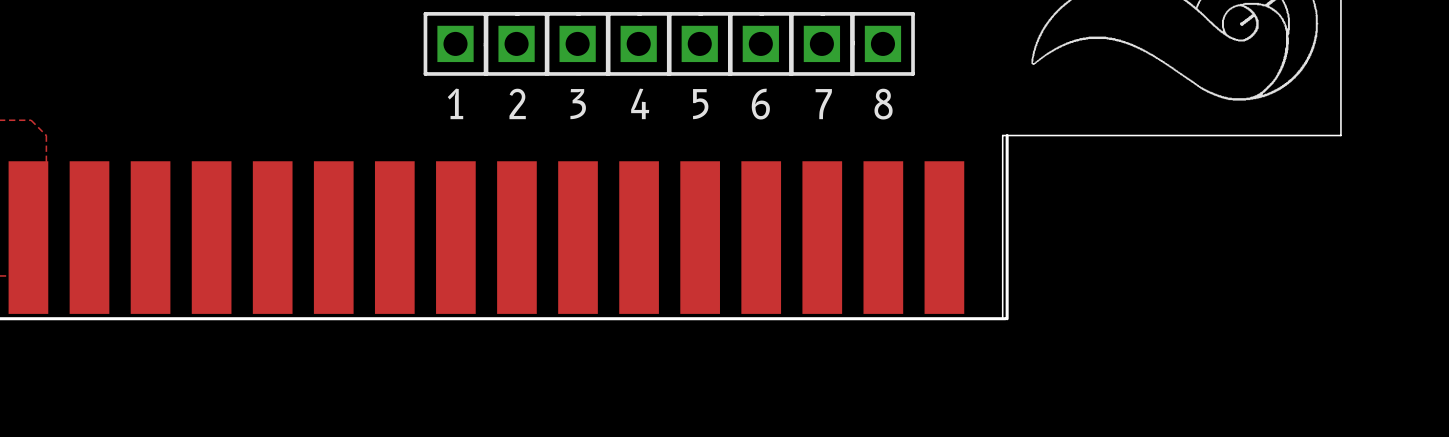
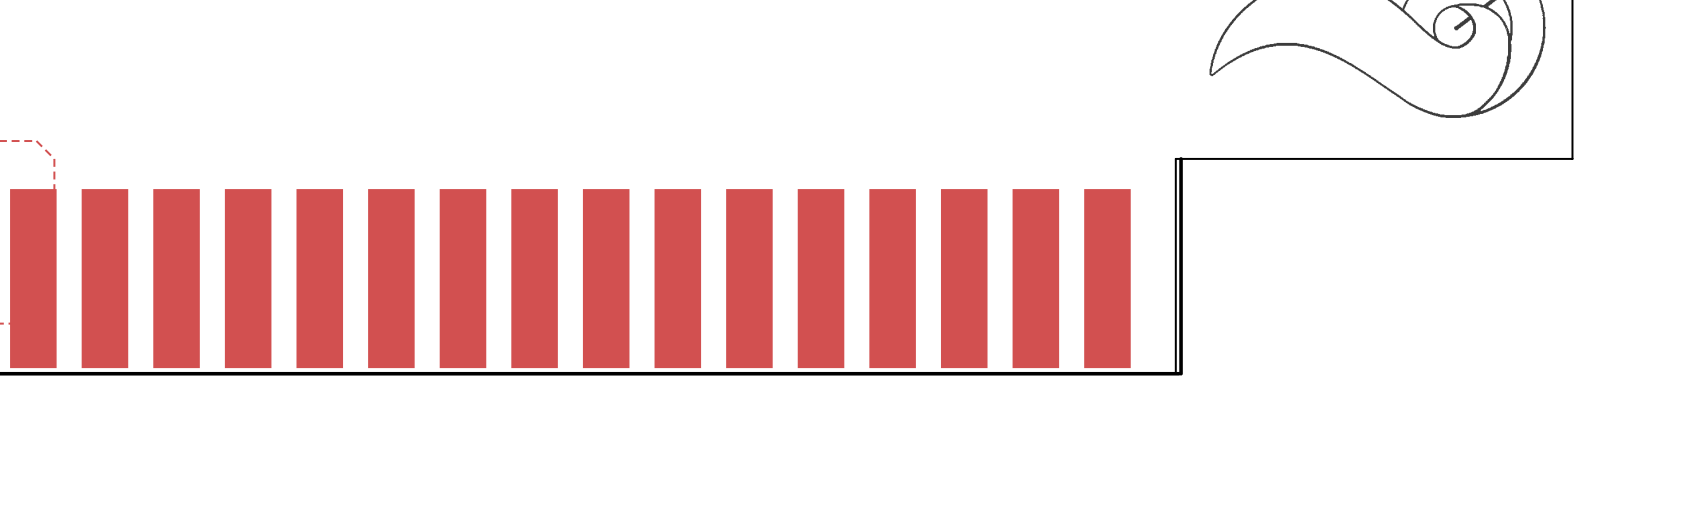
part: (455, 43) -> none
part: (516, 43) -> none
part: (577, 43) -> none
part: (638, 43) -> none
part: (699, 43) -> none
part: (760, 43) -> none
part: (821, 43) -> none
part: (882, 43) -> none
text: 1 (455, 103) -> none
text: 2 (517, 103) -> none
text: 4 (640, 103) -> none
text: 3 (578, 104) -> none
text: 5 (700, 104) -> none
text: 6 (760, 104) -> none
text: 7 (823, 104) -> none
text: 8 (883, 104) -> none

